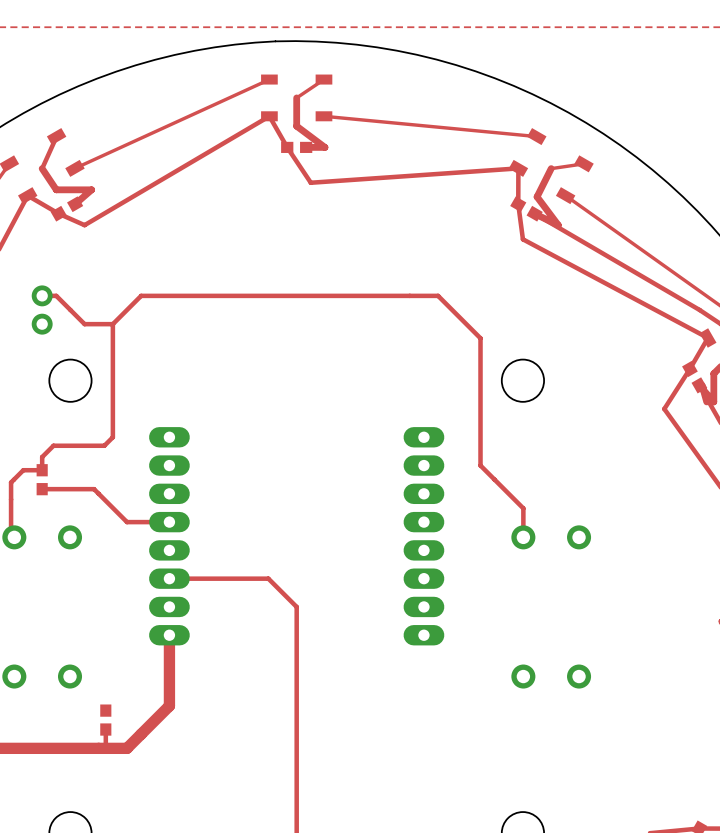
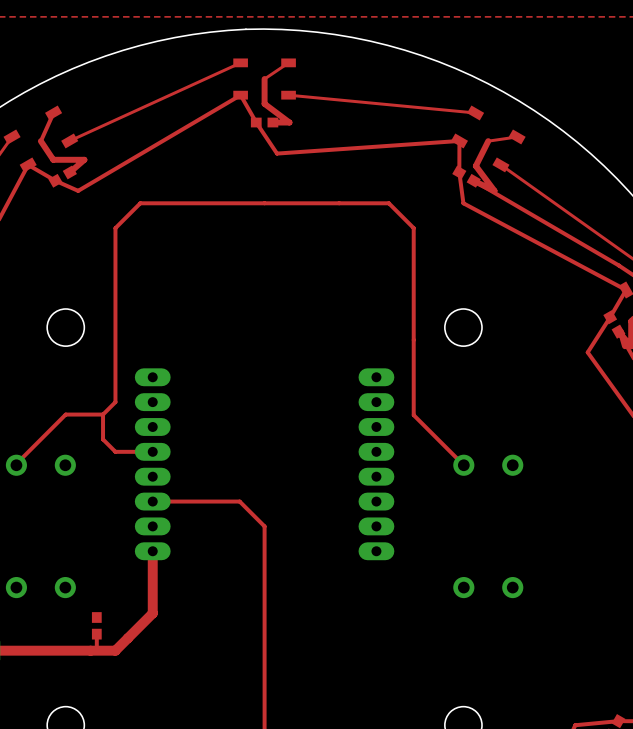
top track: (42, 295) (56, 295) (84, 324) (112, 324) -> none
part: (42, 310) -> none
top track: (112, 324) (141, 295) (438, 295) (480, 338) (480, 465) (523, 508) (523, 537) -> (103, 414) (115, 402) (115, 228) (140, 203) (388, 203) (413, 228) (413, 415) (463, 465)
top track: (112, 324) (112, 437) (104, 445) (53, 445) (42, 457) (42, 470) (23, 470) (11, 482) (11, 534) (14, 537) -> (103, 414) (65, 414) (16, 465)
part: (42, 479) -> none
top track: (42, 489) (94, 489) (112, 507) -> (103, 414) (103, 439)

